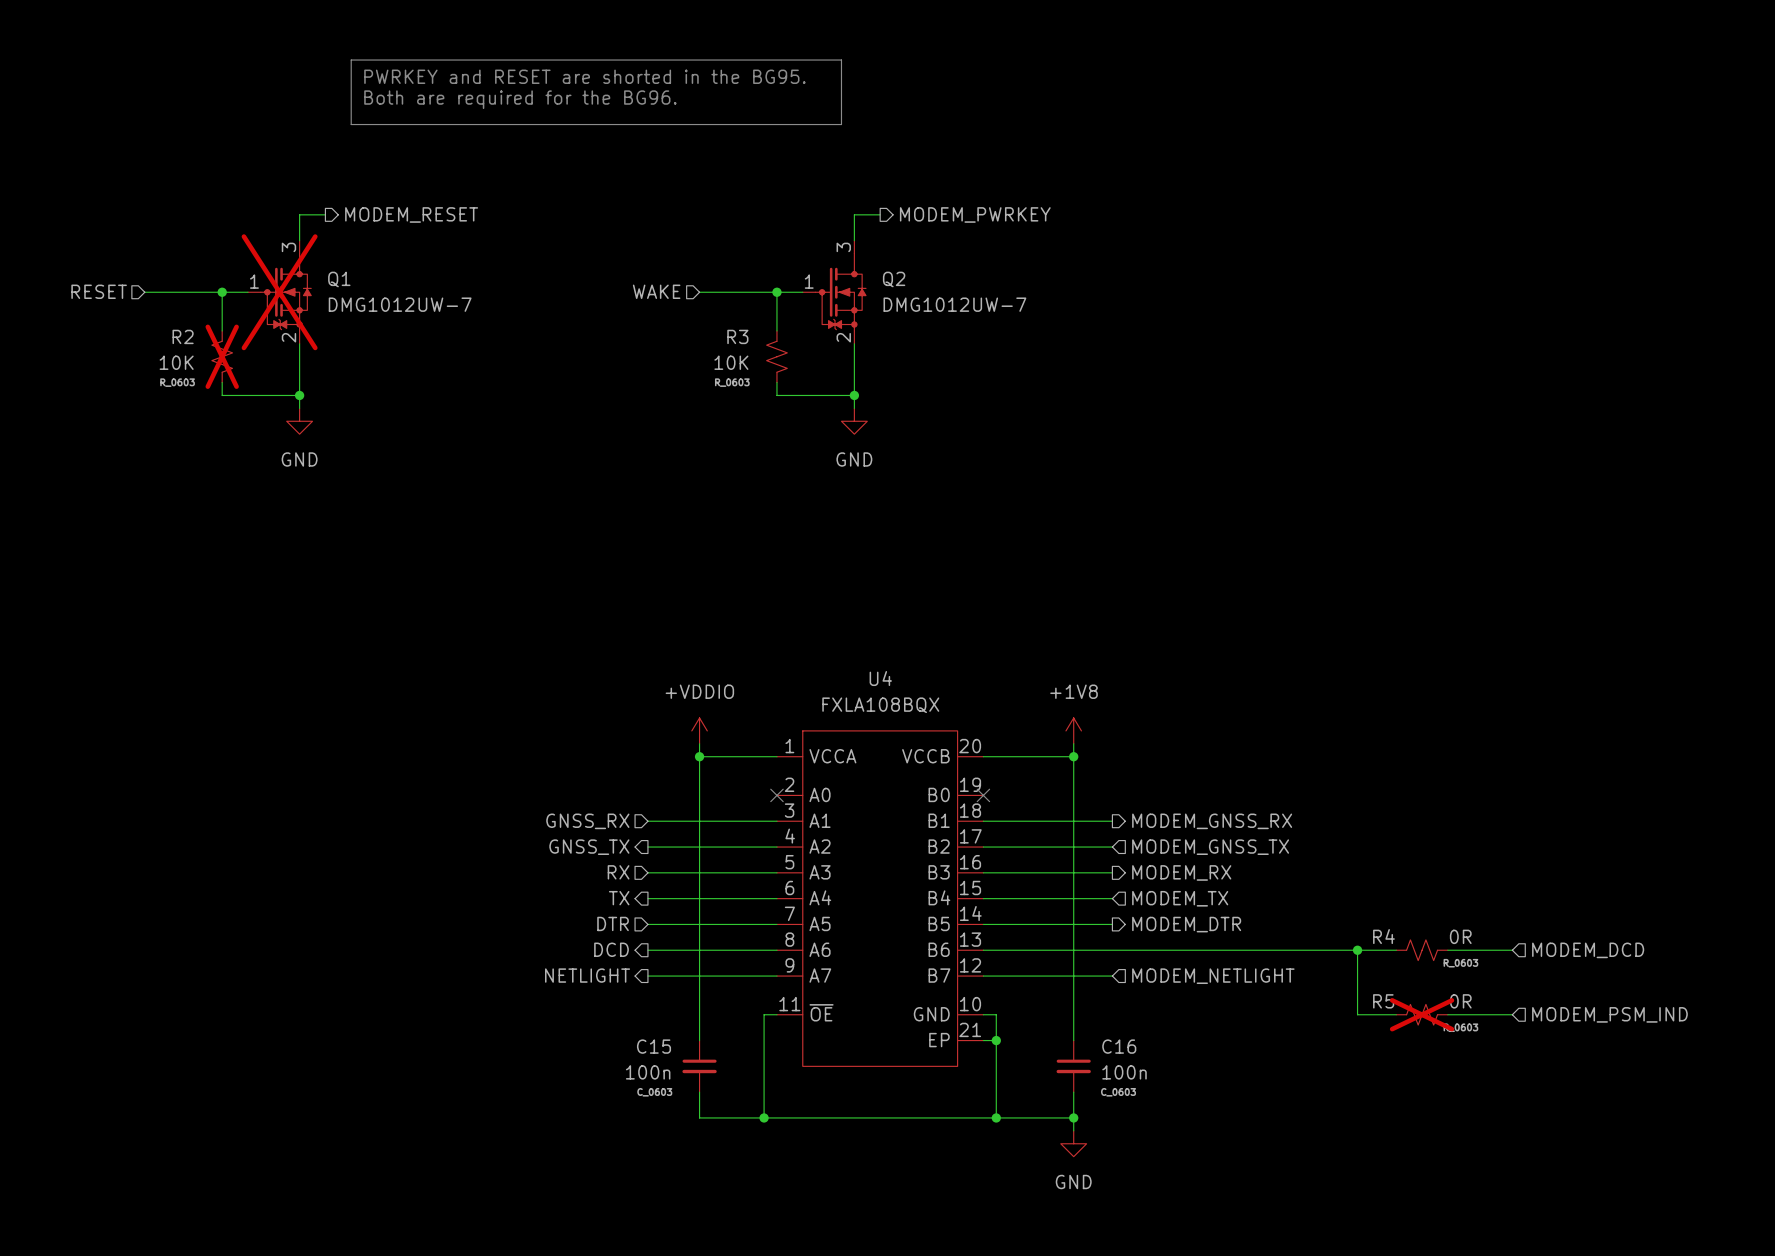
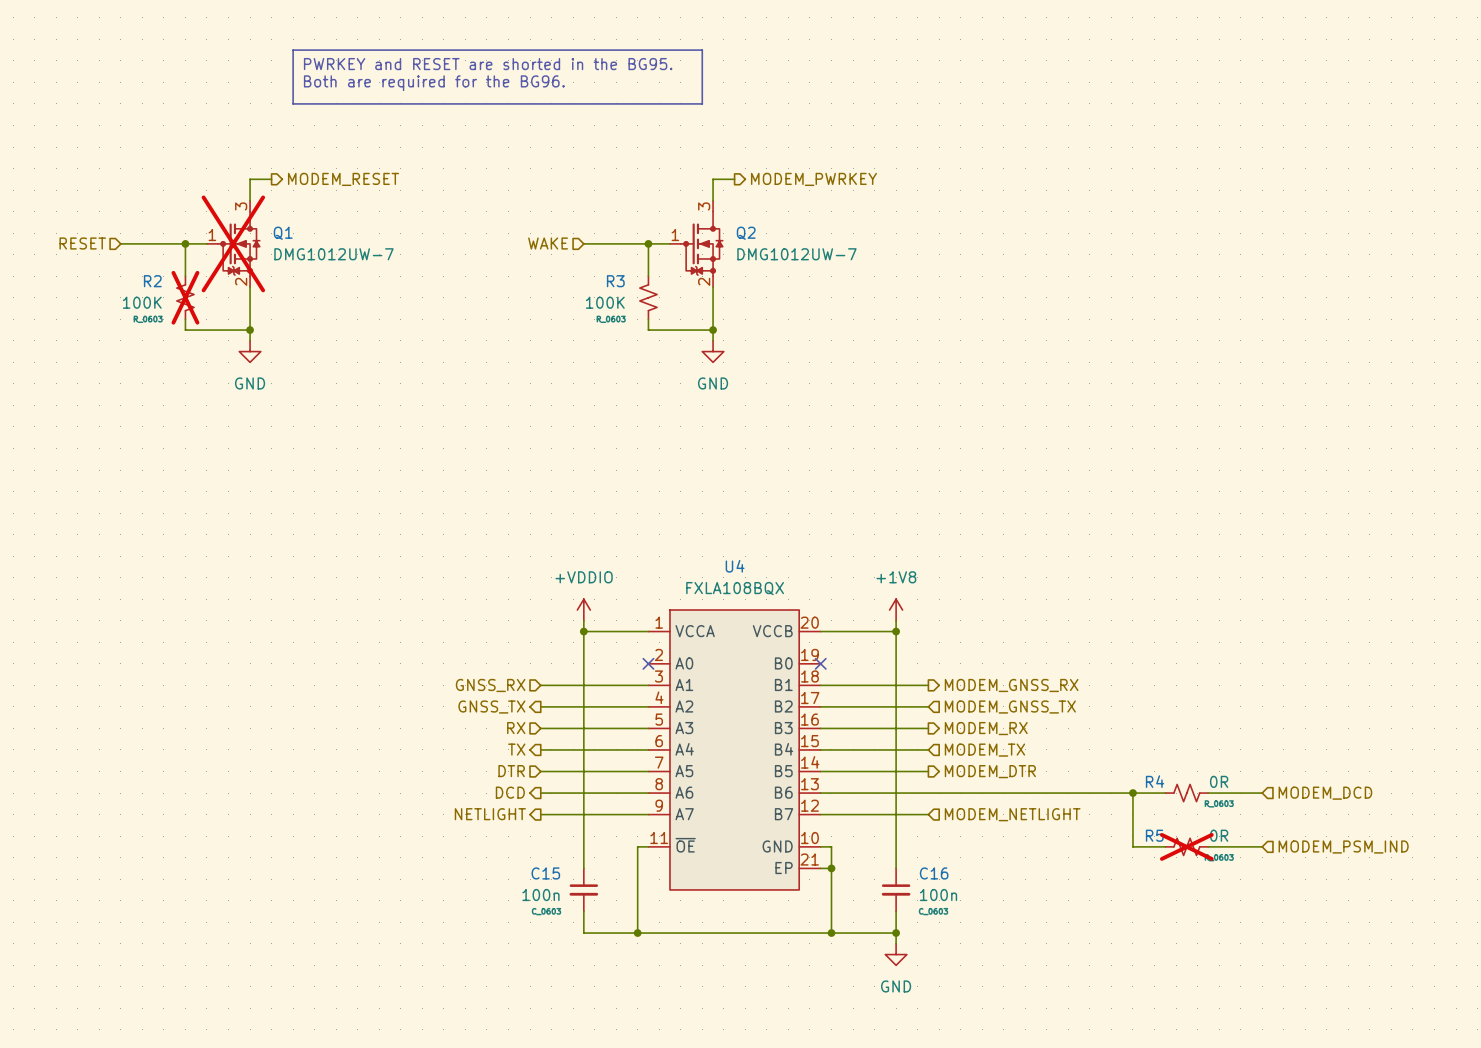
R2 value: 10K (176, 362) -> 100K (142, 302)
R3 value: 10K (731, 362) -> 100K (605, 302)

